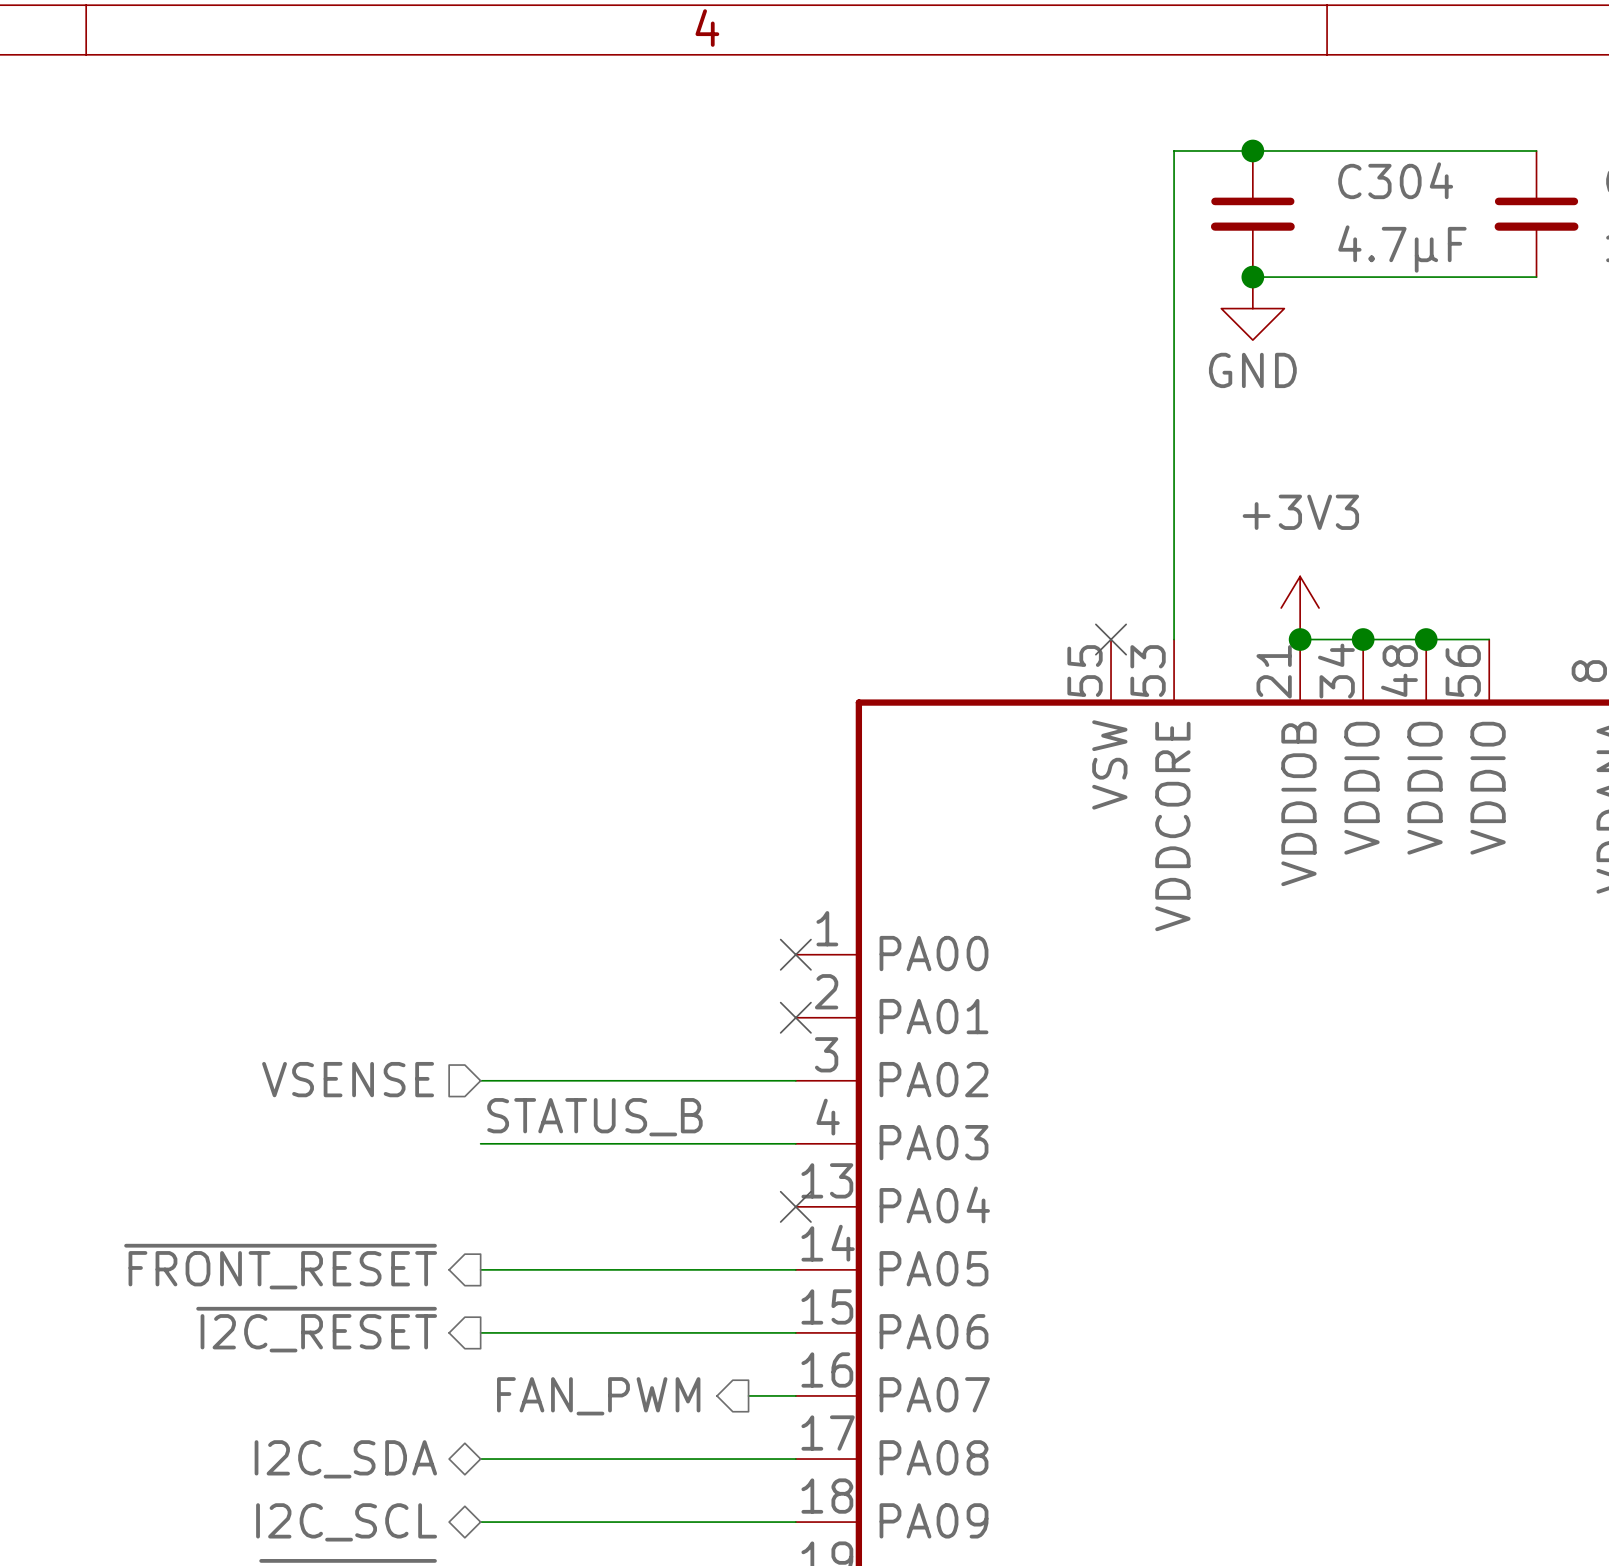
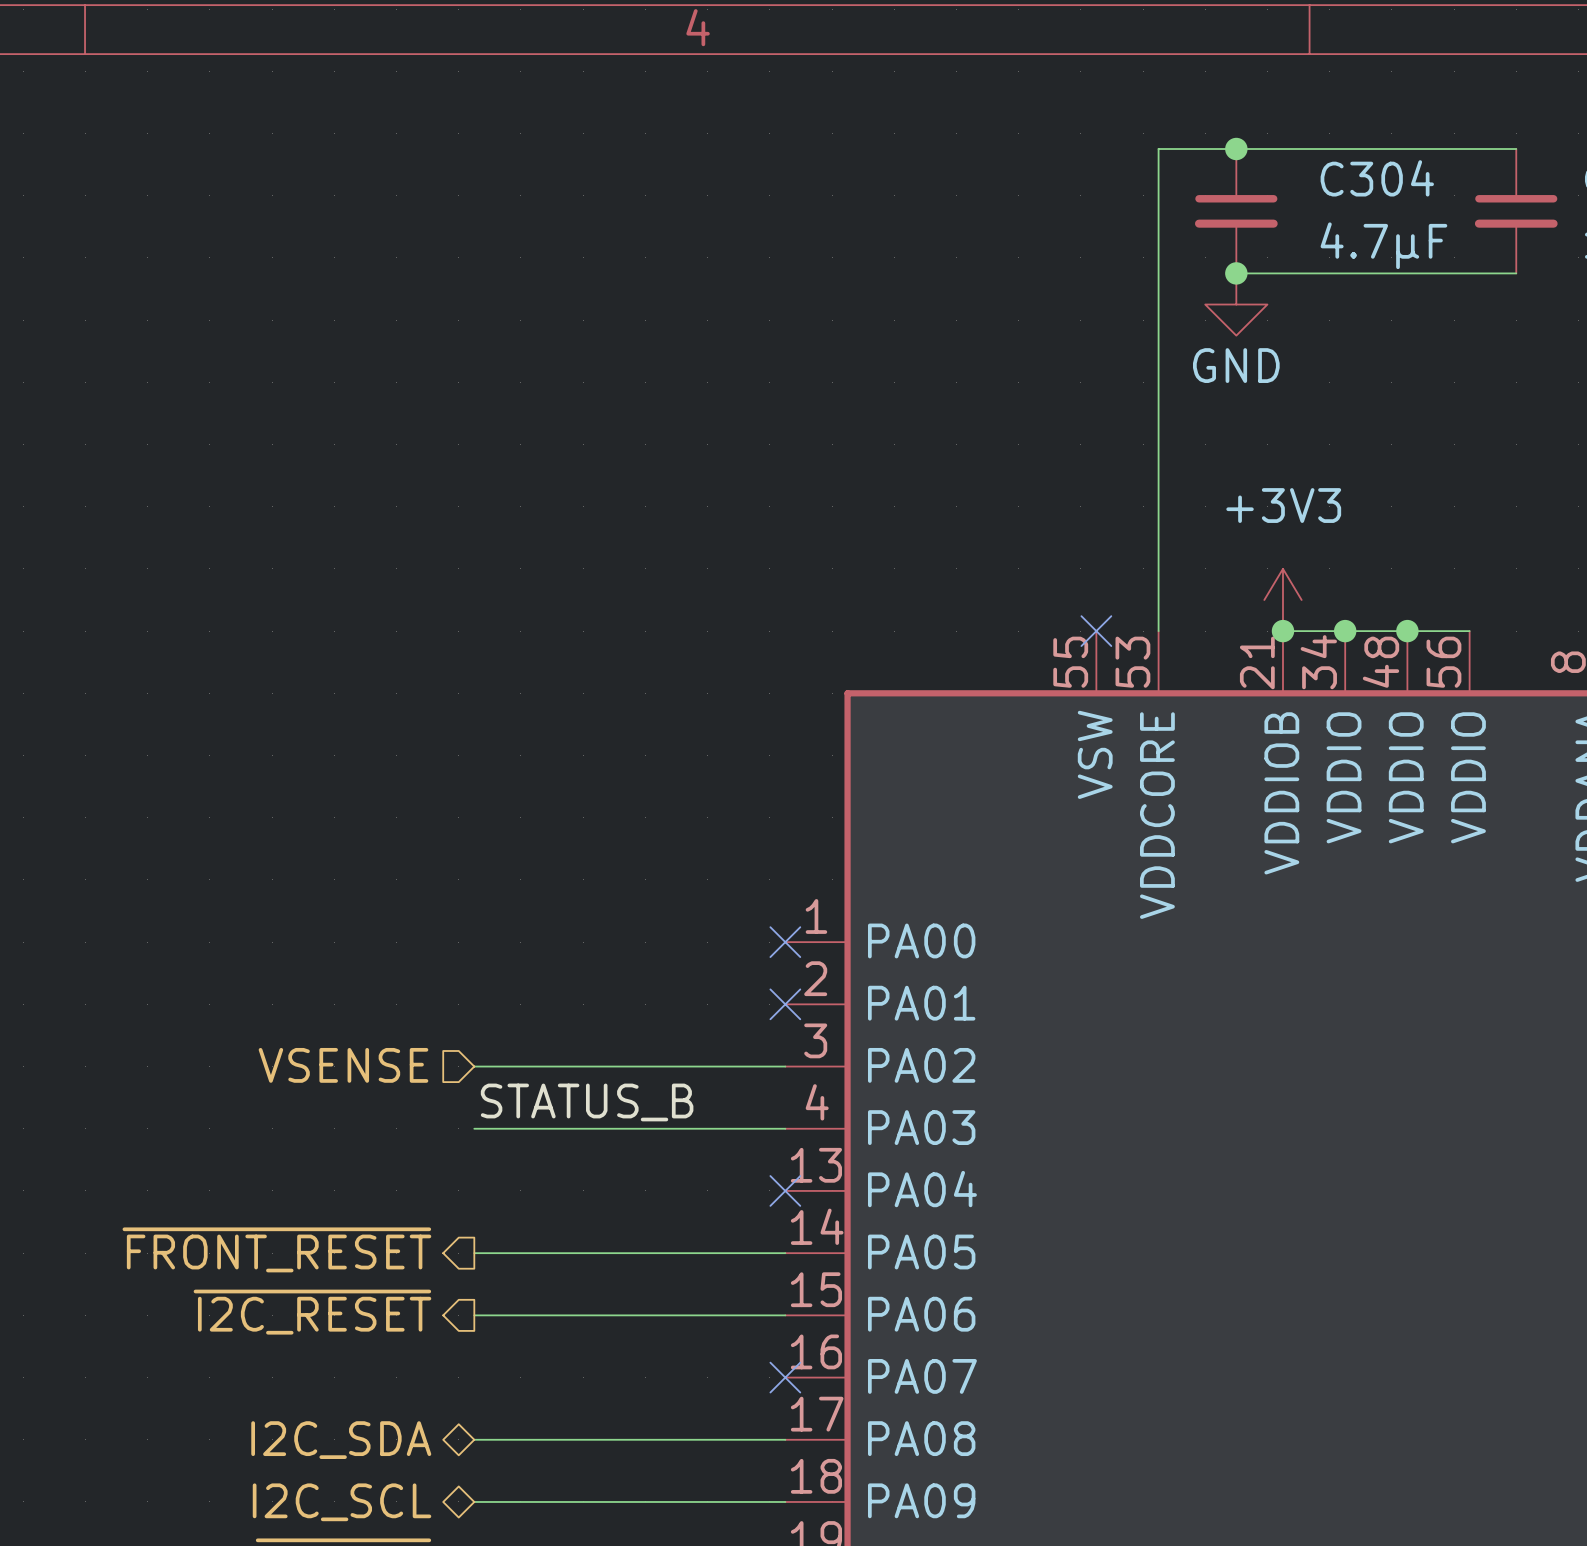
wire: (748, 1395) (795, 1395) -> none
no-connect mark: none -> (785, 1377)
hierarchical label: FAN_PWM (598, 1396) -> none

